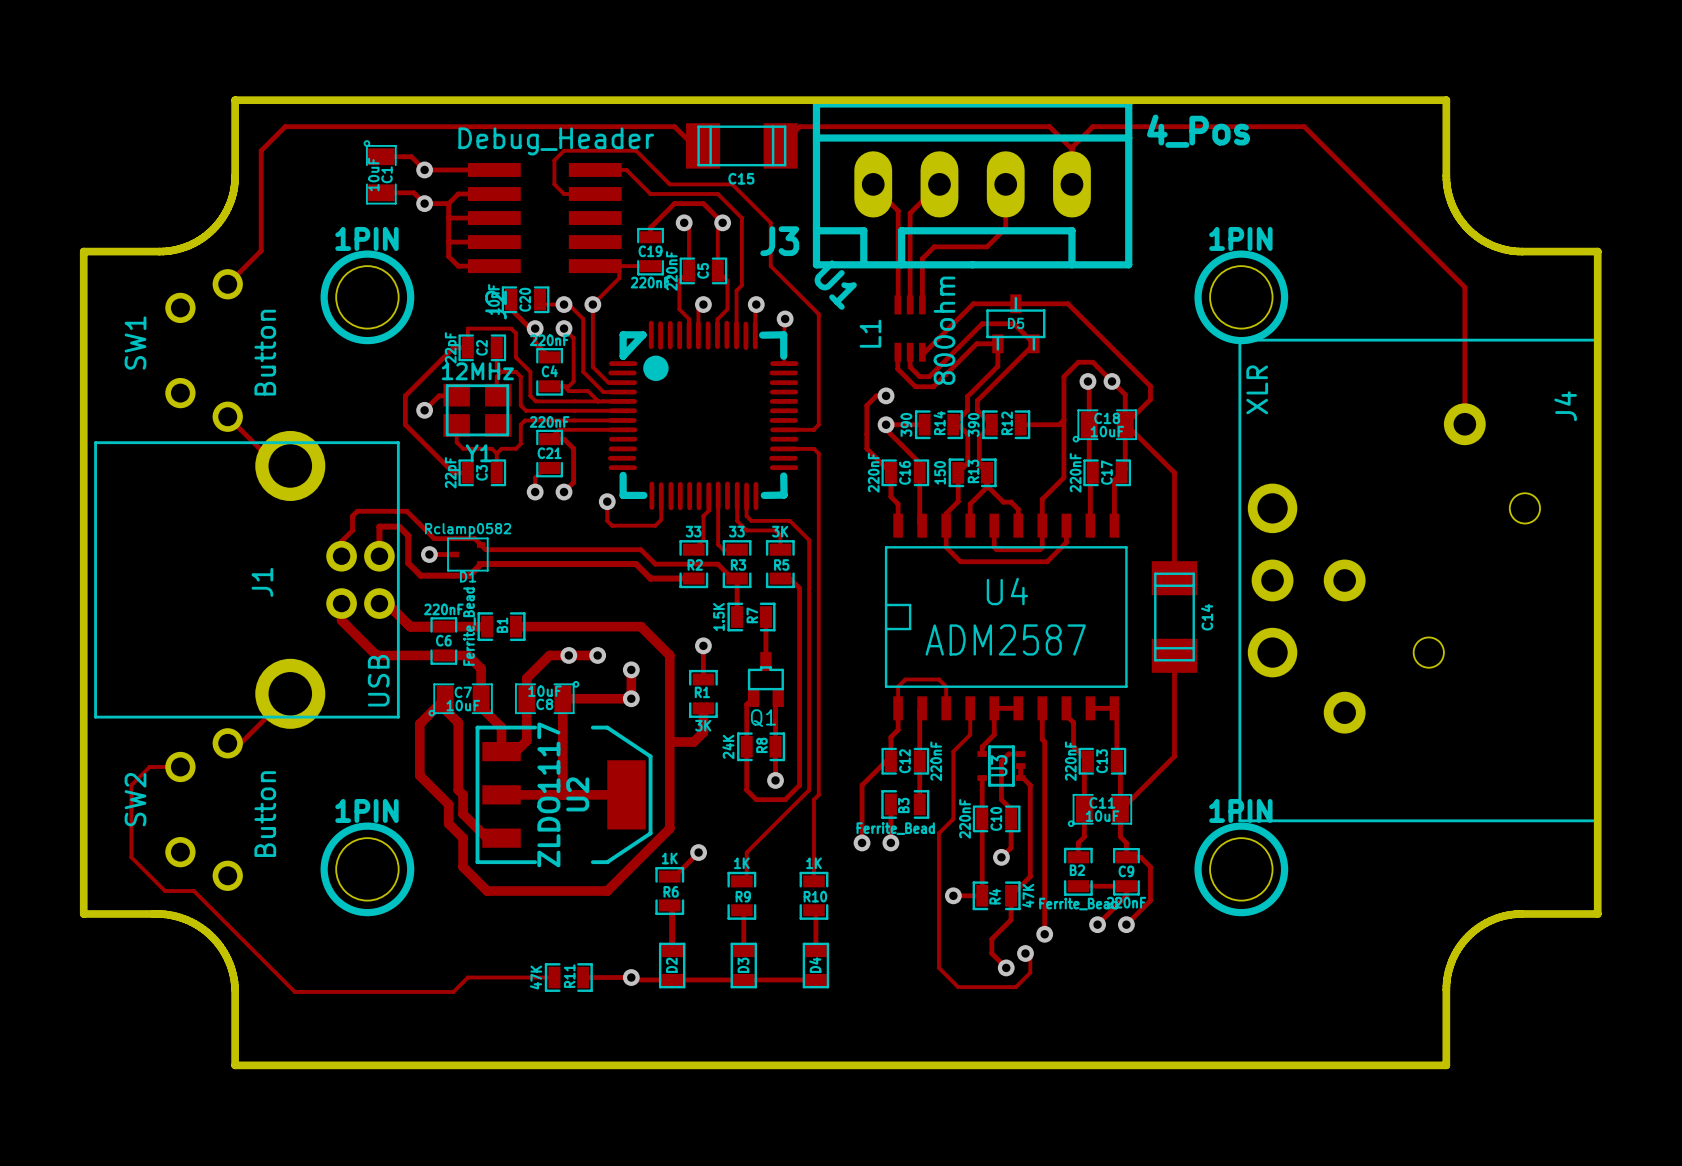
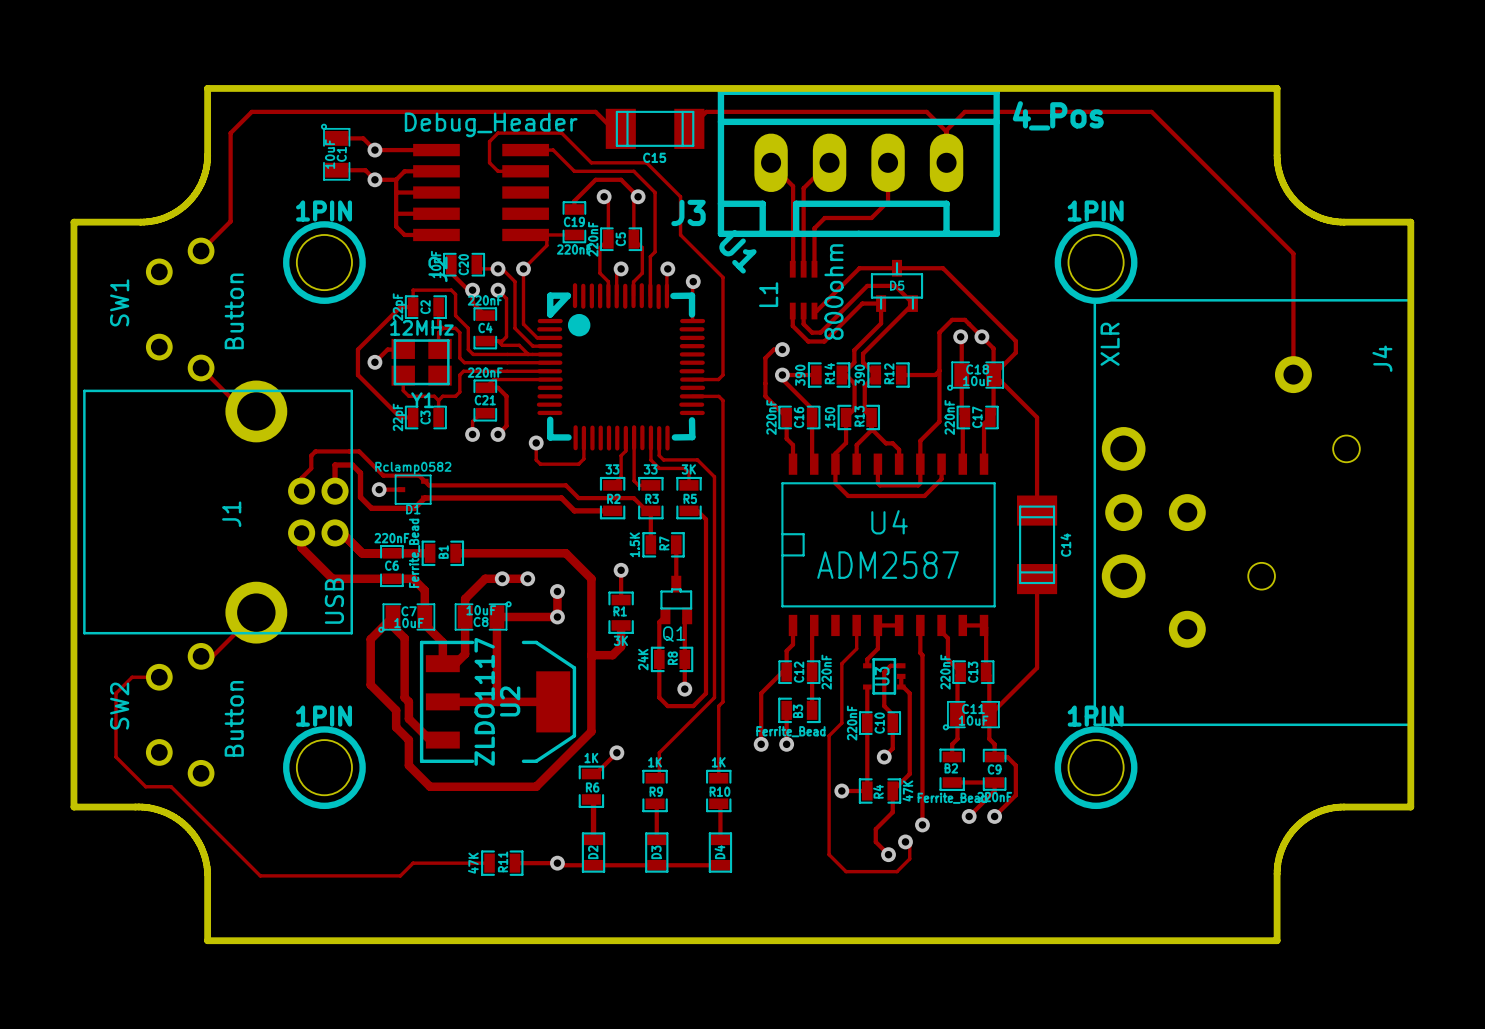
track: (898, 708) (898, 686) (905, 679) (938, 679) (946, 686) (946, 708) -> none

